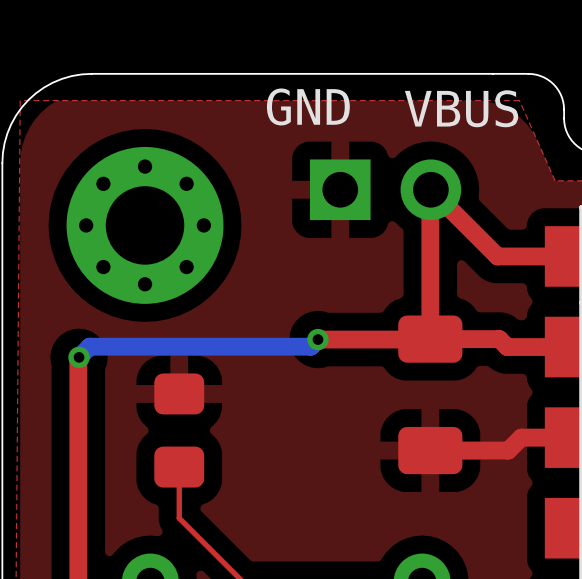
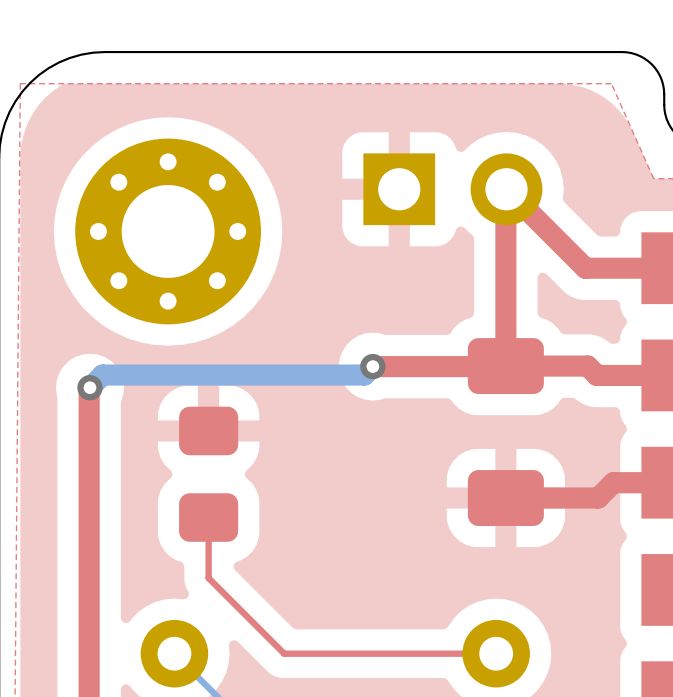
text: GND (308, 106) -> none
text: VBUS (461, 108) -> none

